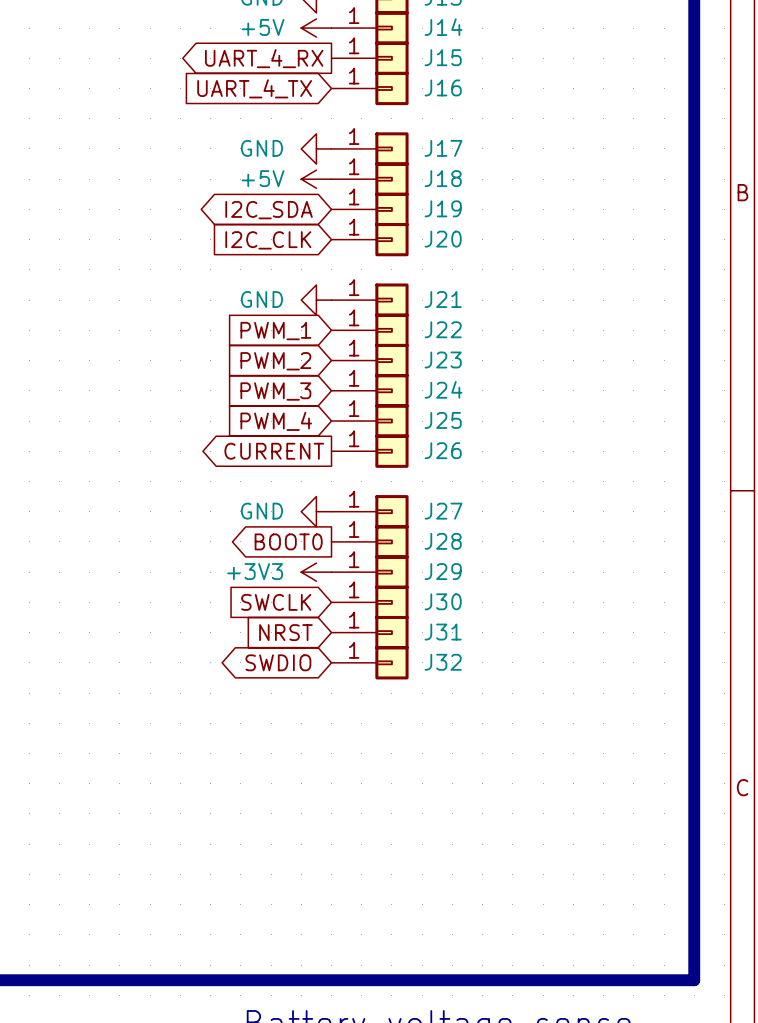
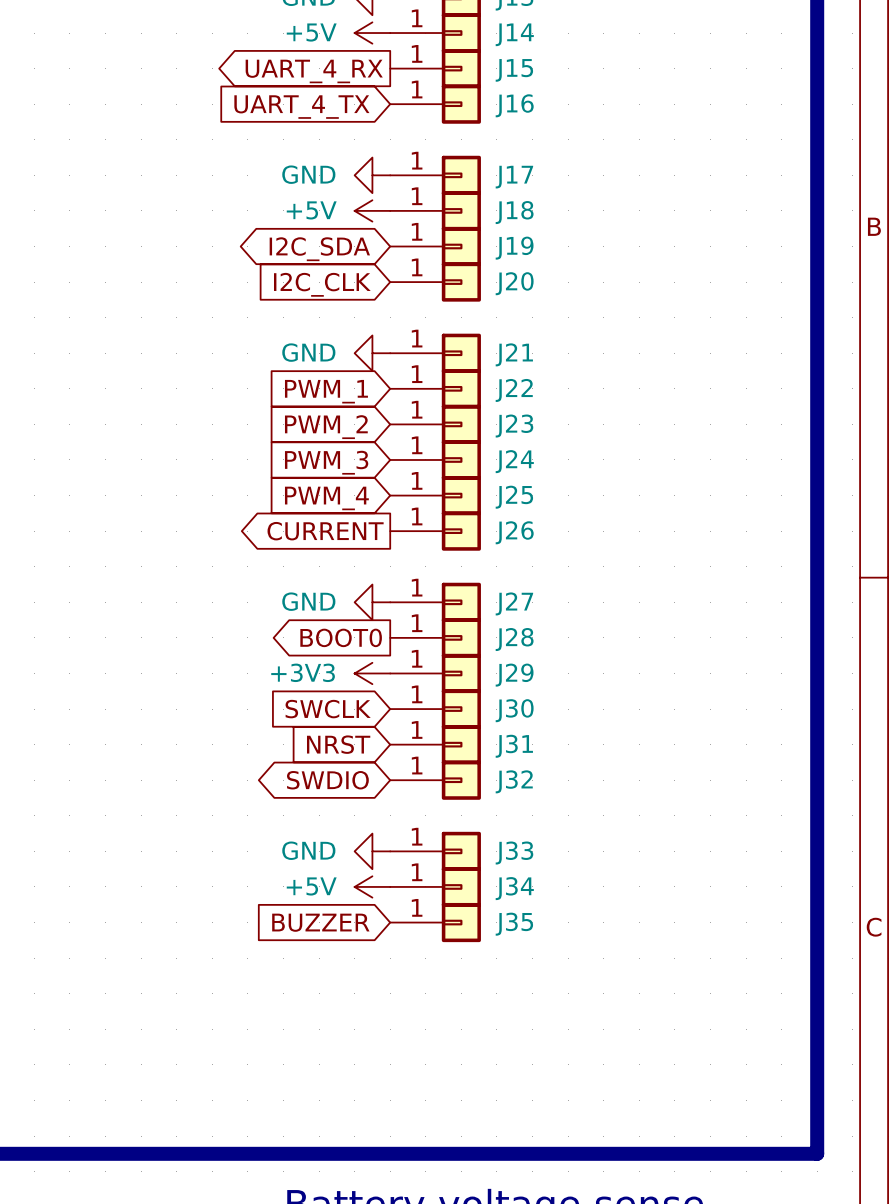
power symbol: none -> GND (372, 851)
J33: none -> (435, 851)
power symbol: none -> +5V (372, 886)
J34: none -> (435, 886)
global label: none -> BUZZER (320, 922)
J35: none -> (435, 922)

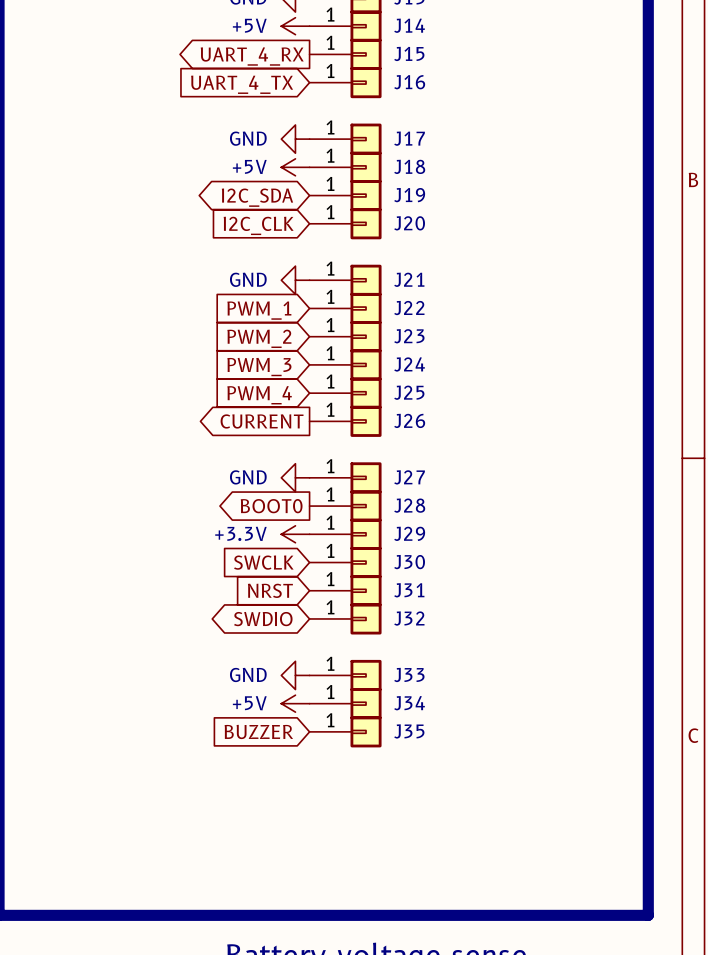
power symbol: +3V3 (372, 673) -> +3.3V (295, 534)

